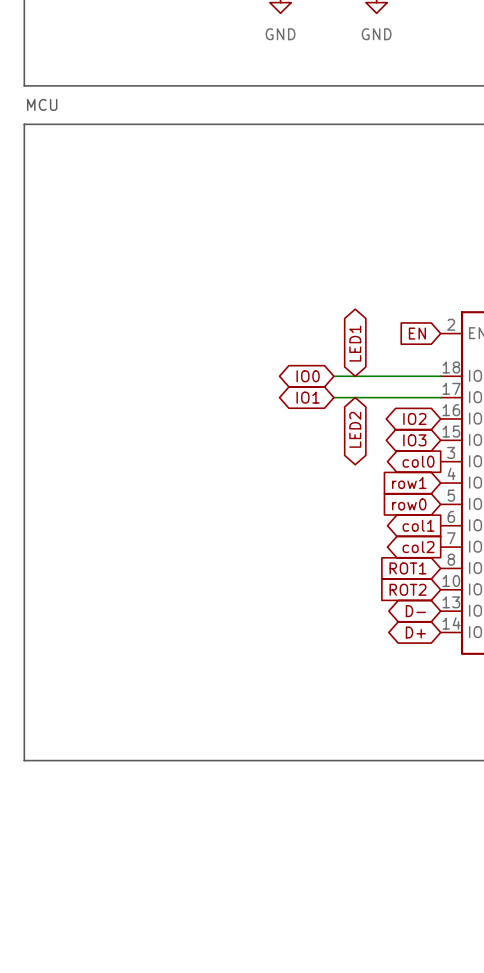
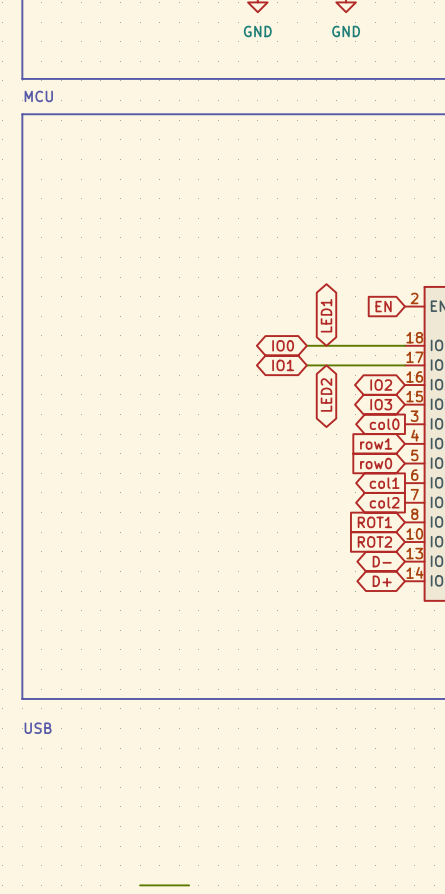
text: none -> USB (38, 728)
wire: none -> (140, 885) (189, 885)

